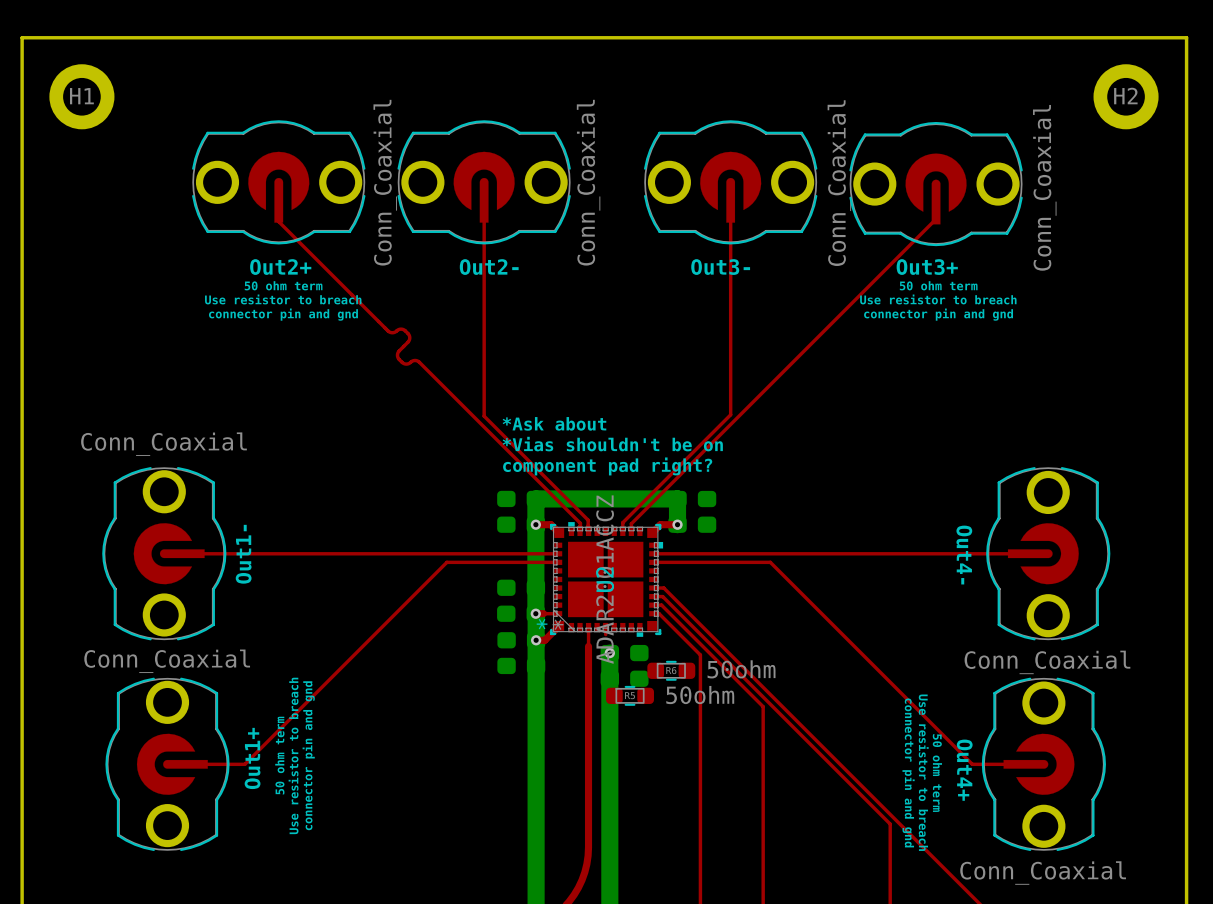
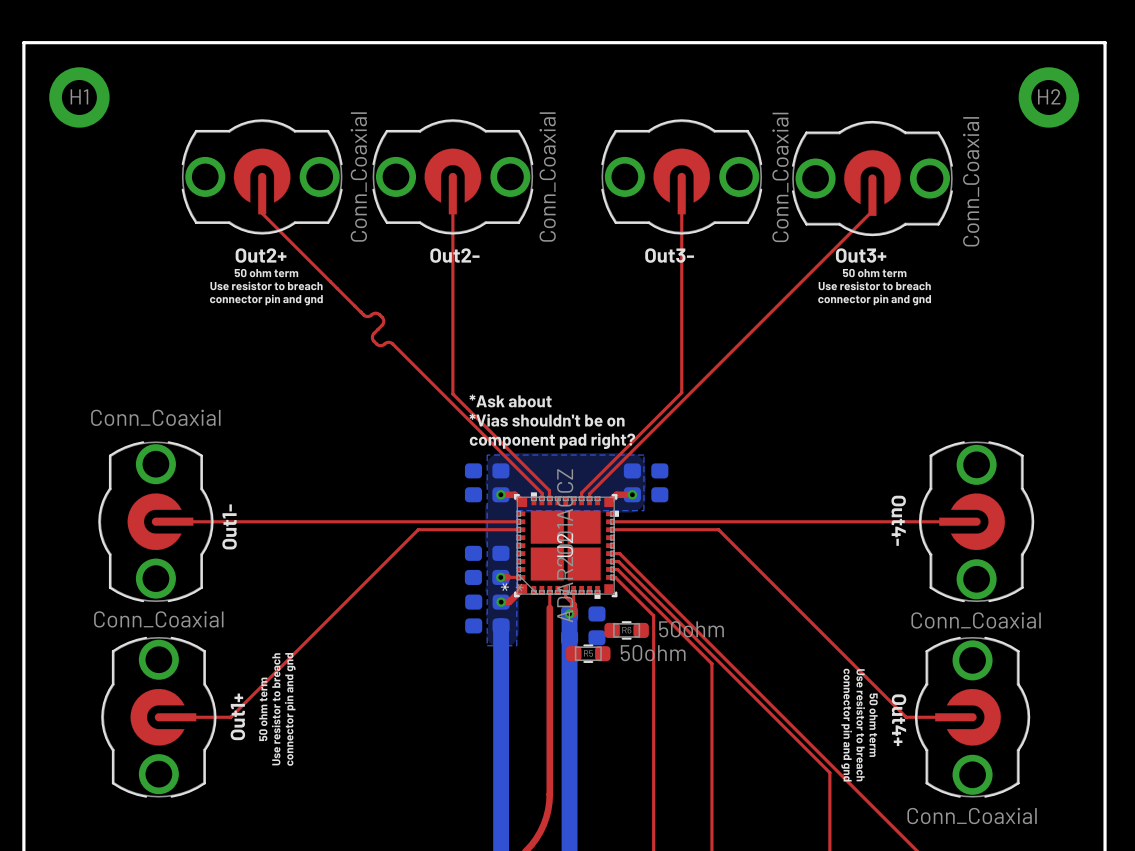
bottom zone outline: none -> (487, 455) (487, 645) (516, 645) (516, 510) (643, 510) (643, 455) (487, 455)
bottom track: (677, 524) (677, 499) (535, 498) (536, 665) -> none
top track: none -> (573, 589) (573, 604) (565, 596)
top track: none -> (573, 604) (572, 614)

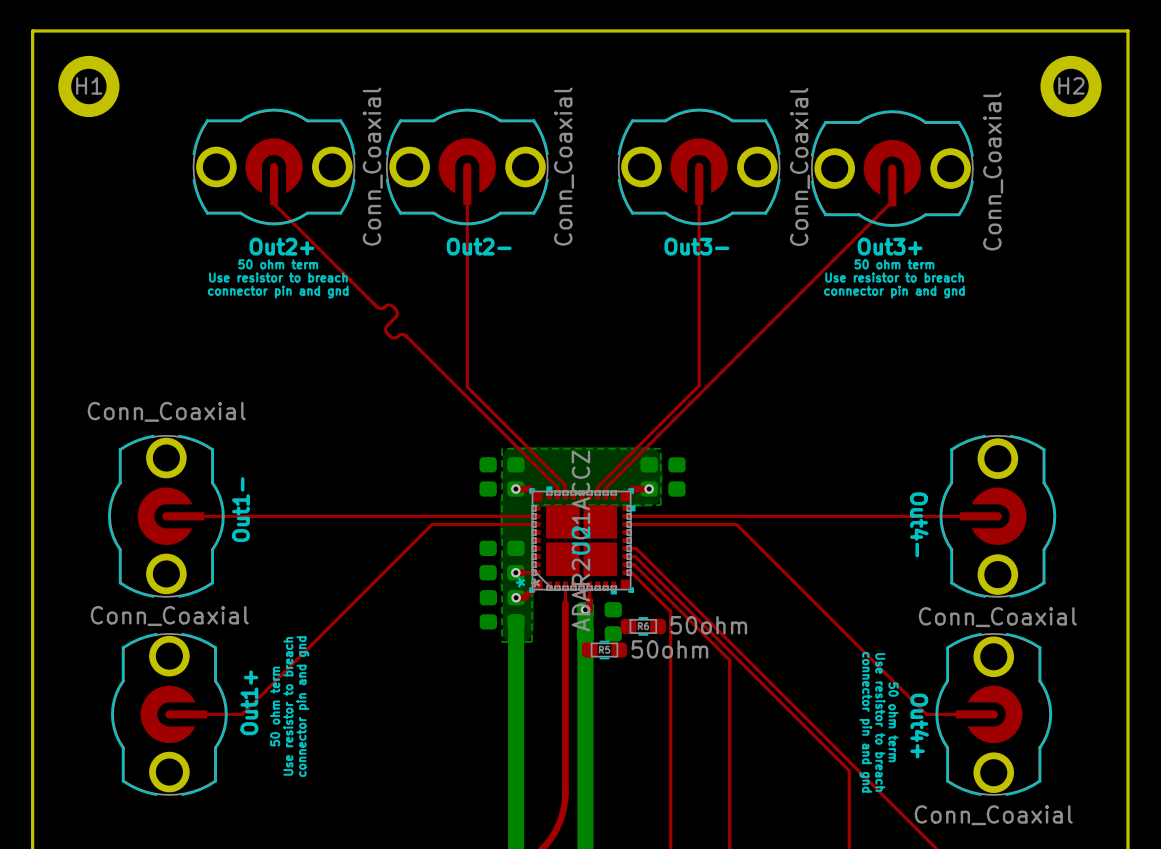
text: *Ask about (510, 400) -> none
text: *Vias shouldn't be on (547, 420) -> none
text: component pad right? (552, 441) -> none

